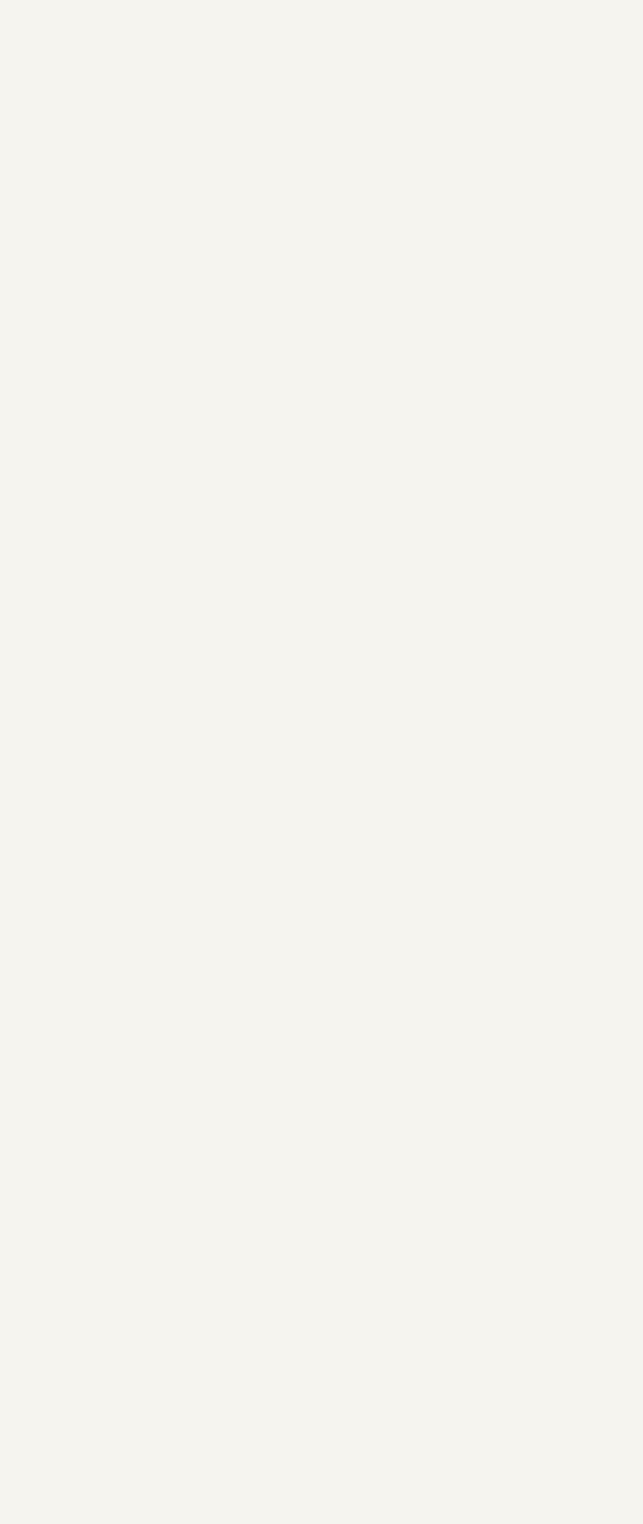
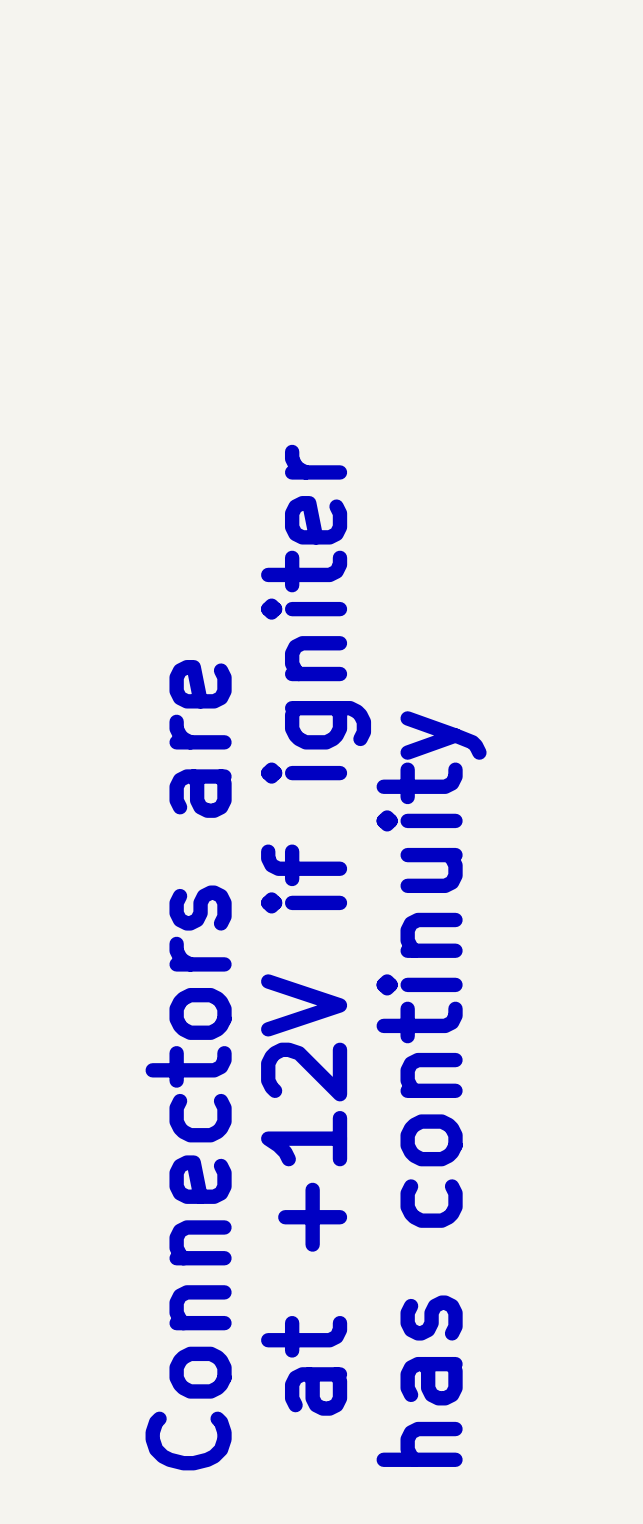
text: none -> at +12V if igniter (316, 930)
text: none -> Connectors are (188, 1065)
text: none -> has continuity (431, 1089)

